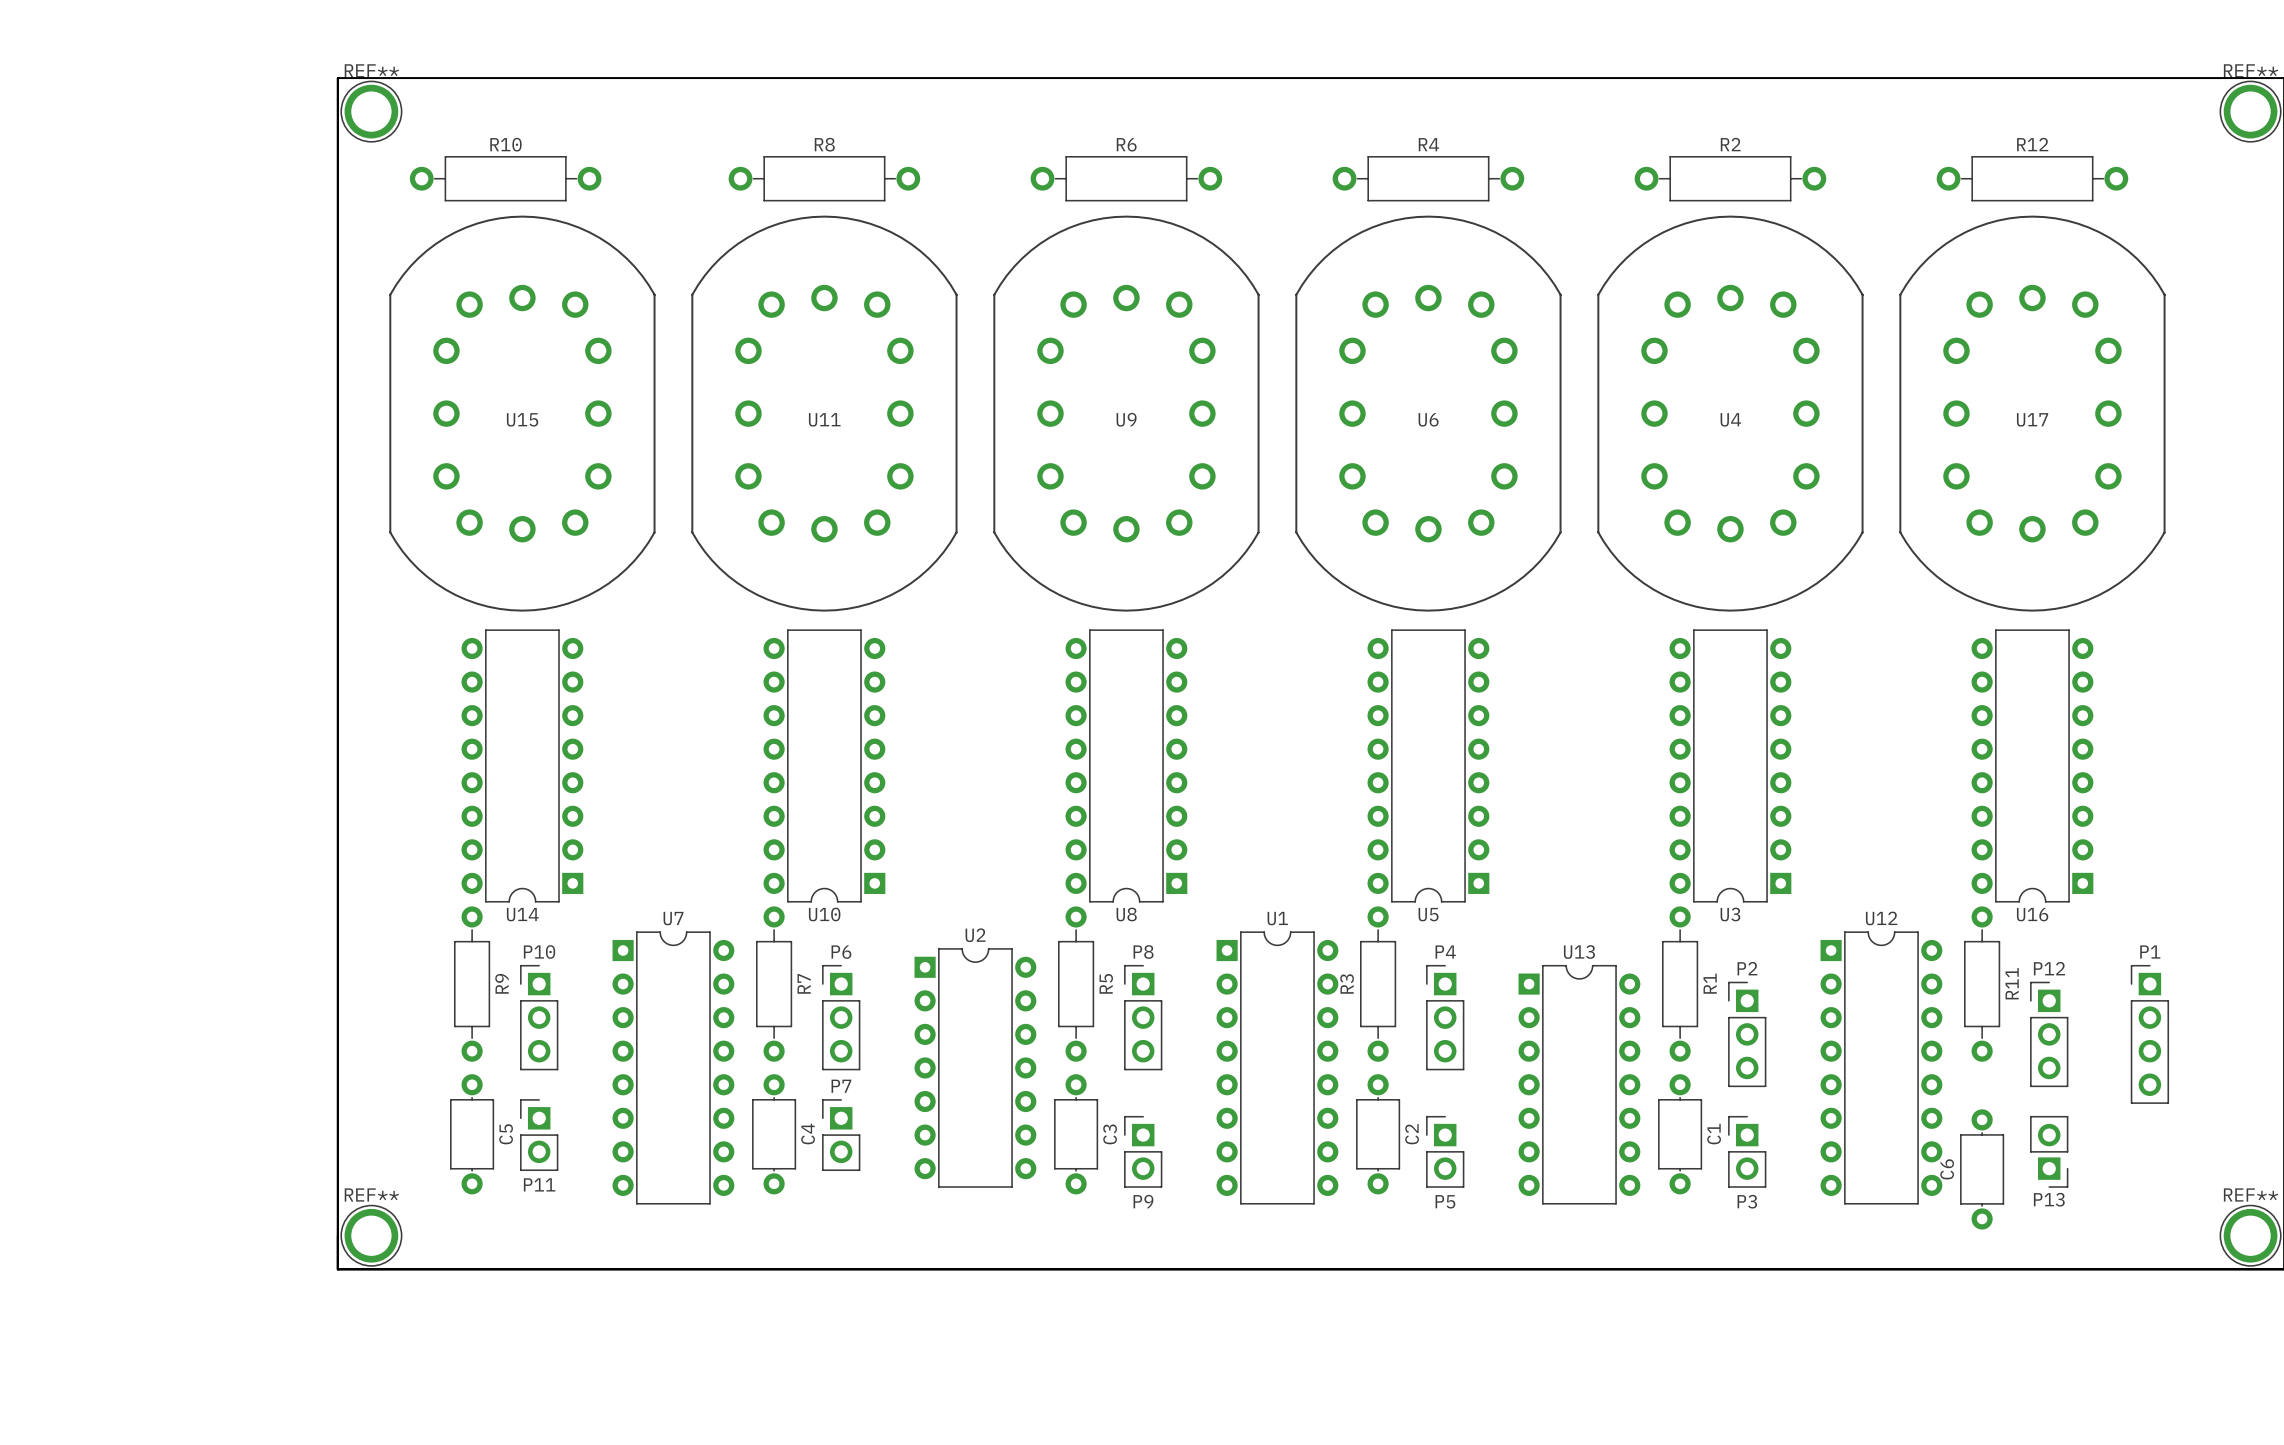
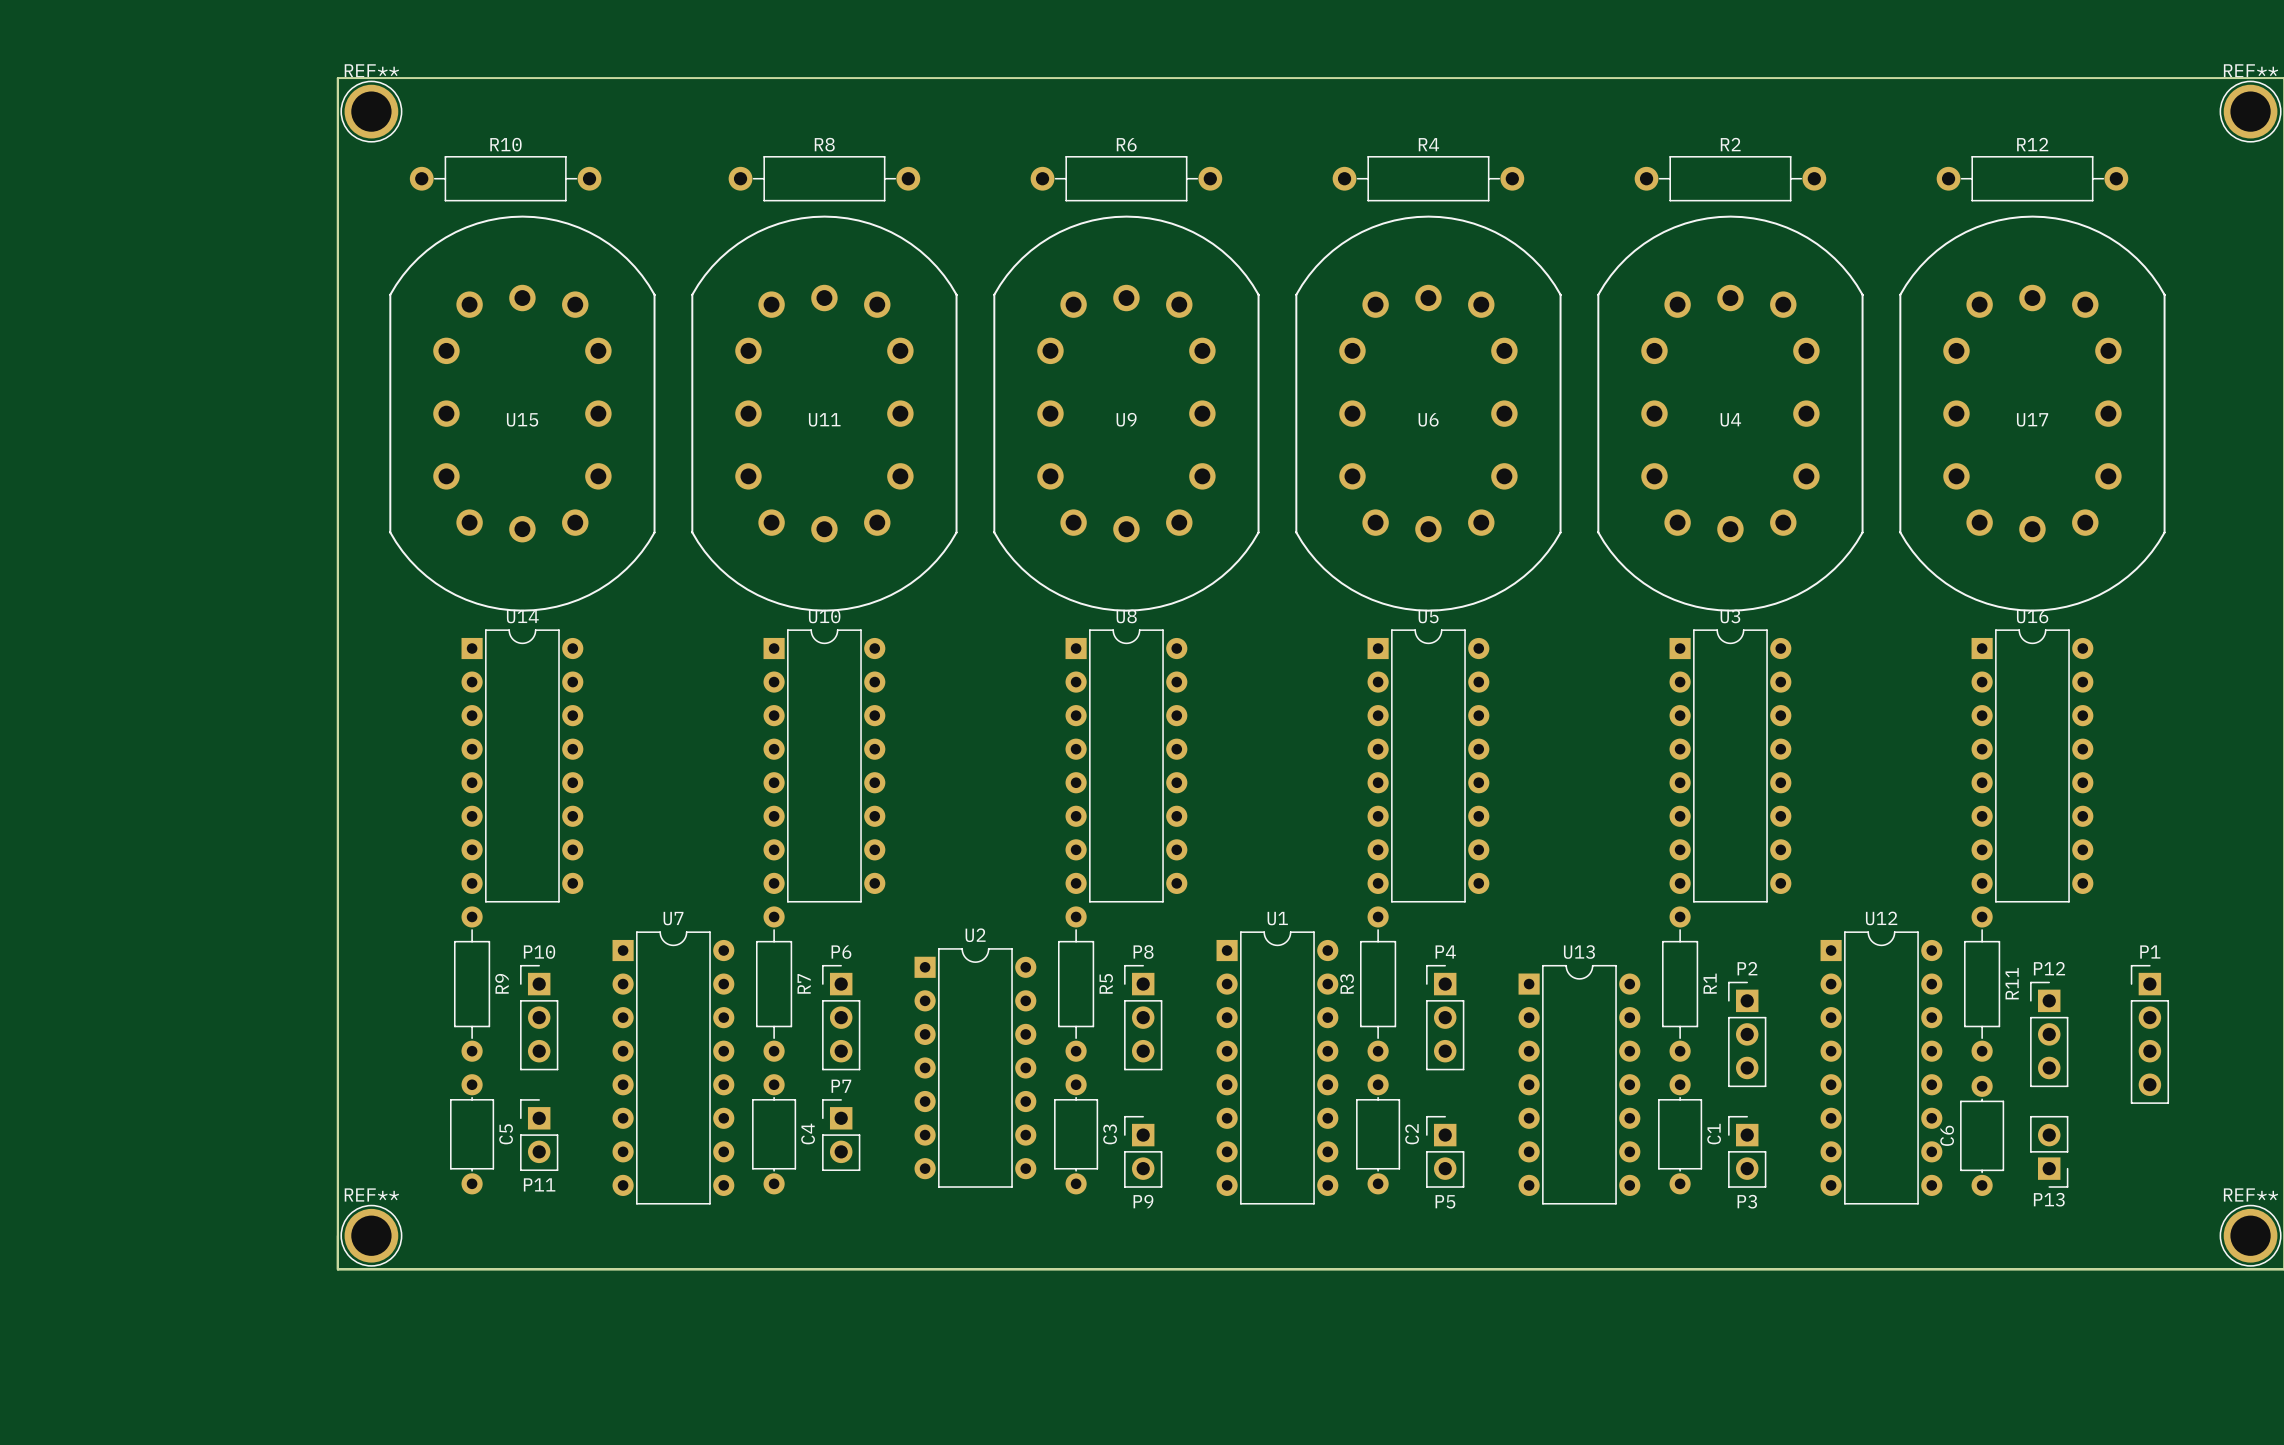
U14 rotation: 0° (522, 765) -> 180° (522, 765)
U10 rotation: 0° (824, 765) -> 180° (824, 765)
U8 rotation: 0° (1126, 765) -> 180° (1126, 765)
U5 rotation: 0° (1428, 765) -> 180° (1428, 765)
U3 rotation: 0° (1730, 765) -> 180° (1730, 765)
U16 rotation: 0° (2032, 765) -> 180° (2032, 765)
C6 position: (1982, 1169) -> (1982, 1135)

